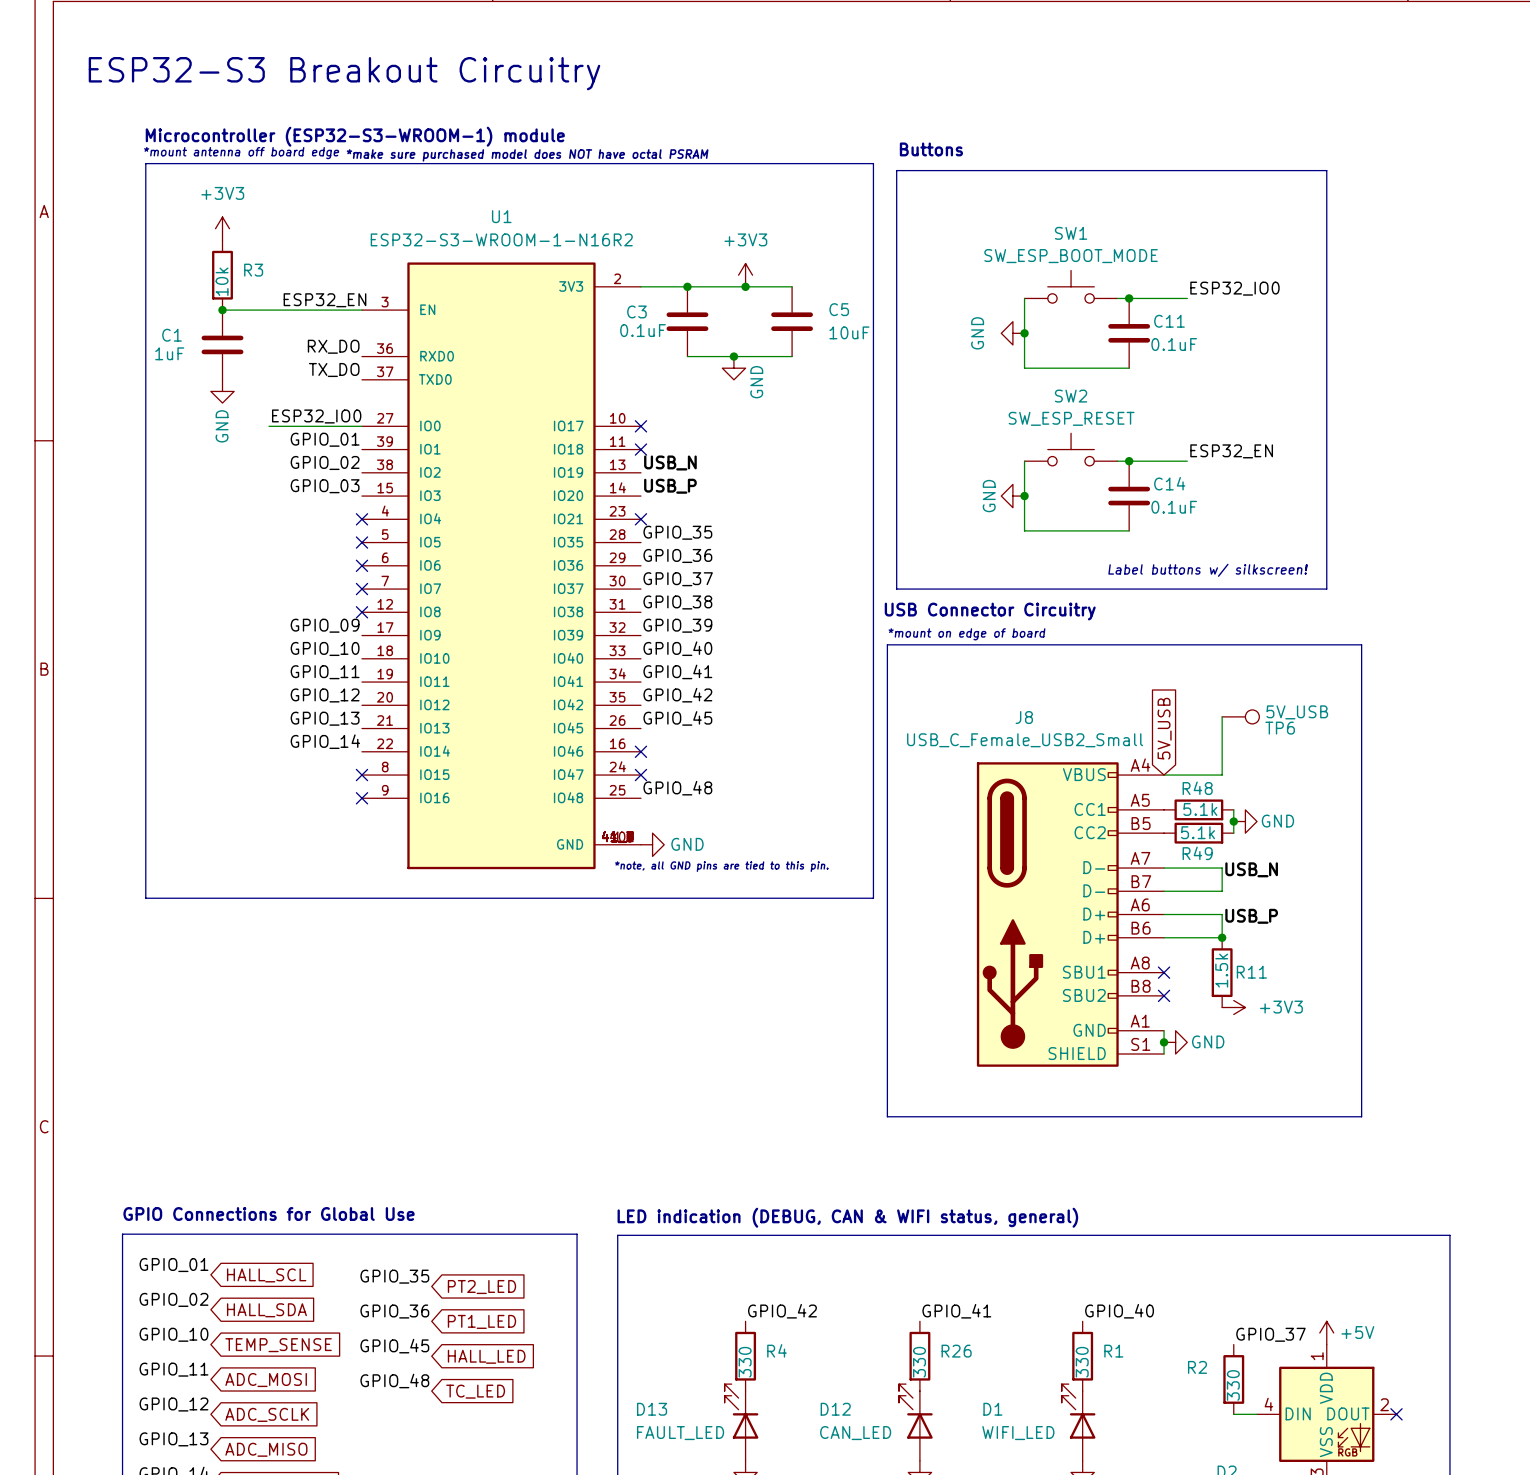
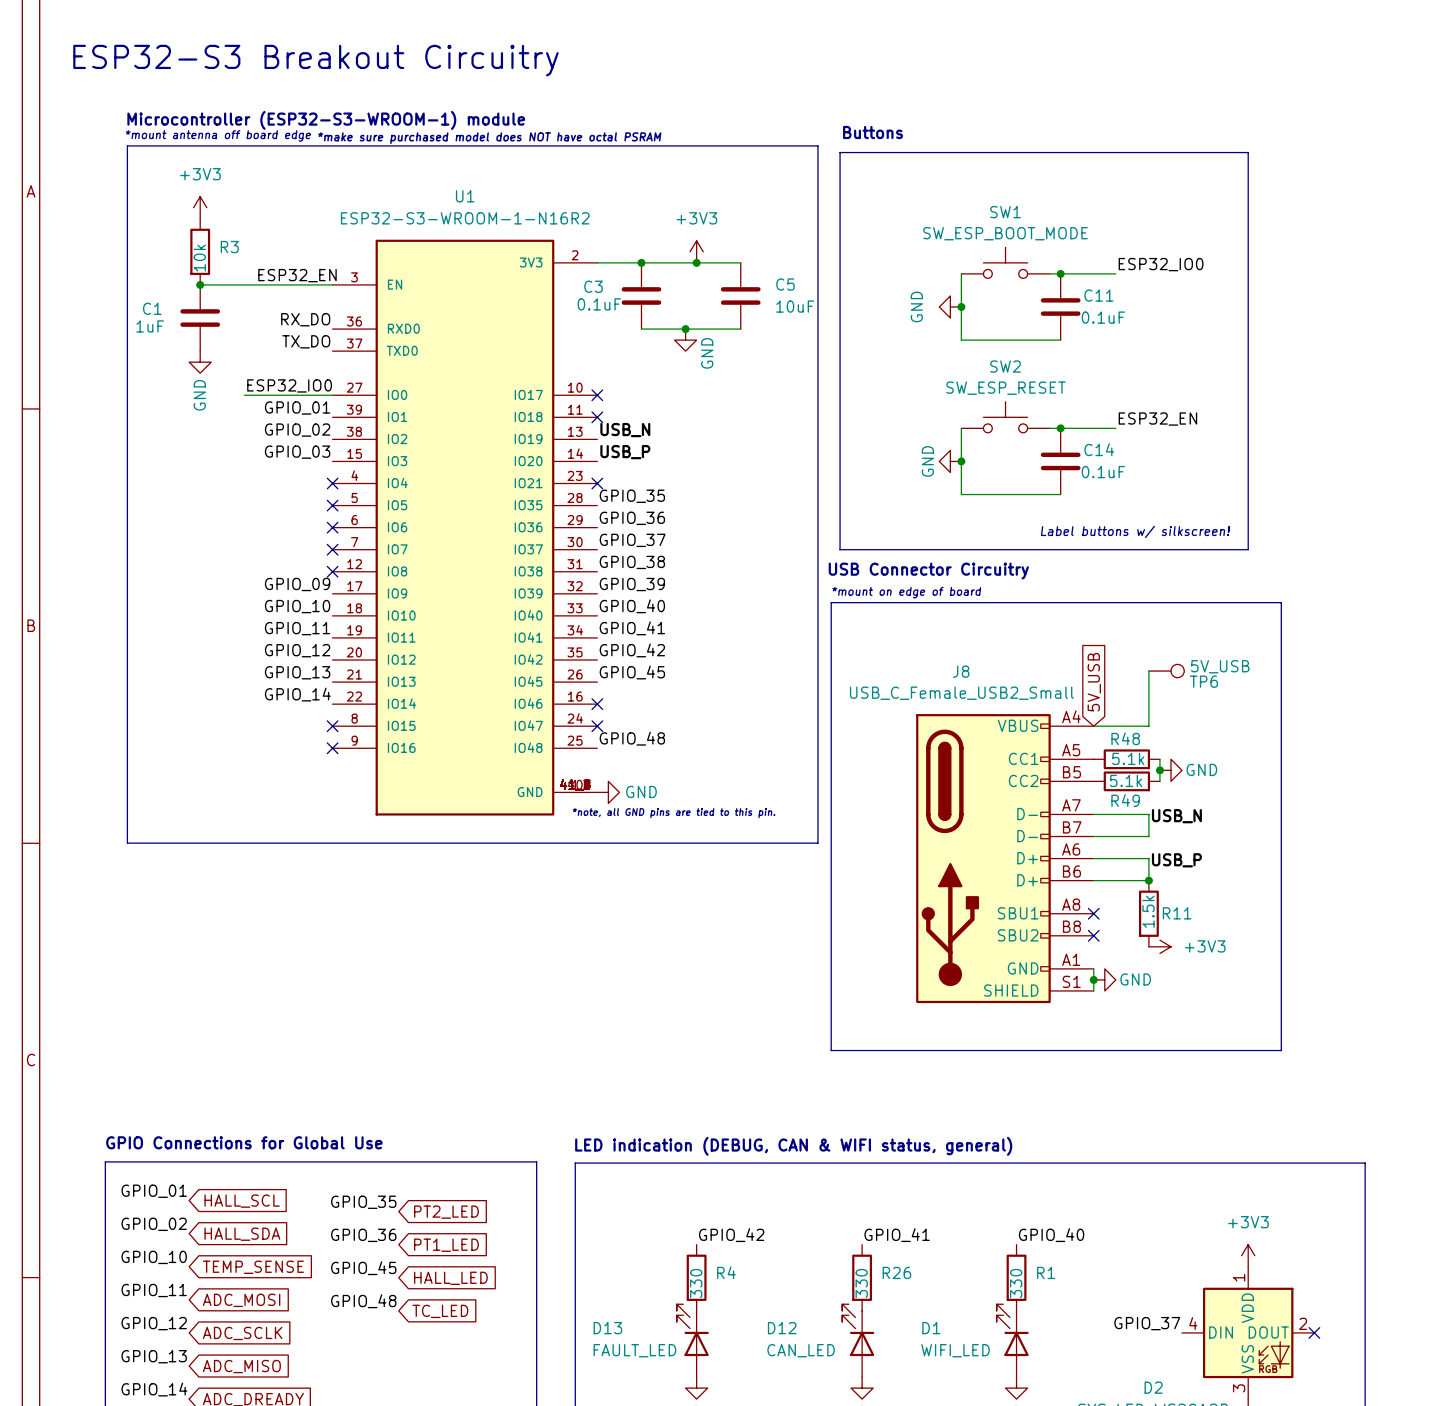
power symbol: +5V (1326, 1332) -> +3V3 (1248, 1255)
label position: GPIO_37 (1270, 1334) -> GPIO_37 (1147, 1323)
R2: 330 (1233, 1379) -> none
wire: (1233, 1414) (1257, 1414) -> none

